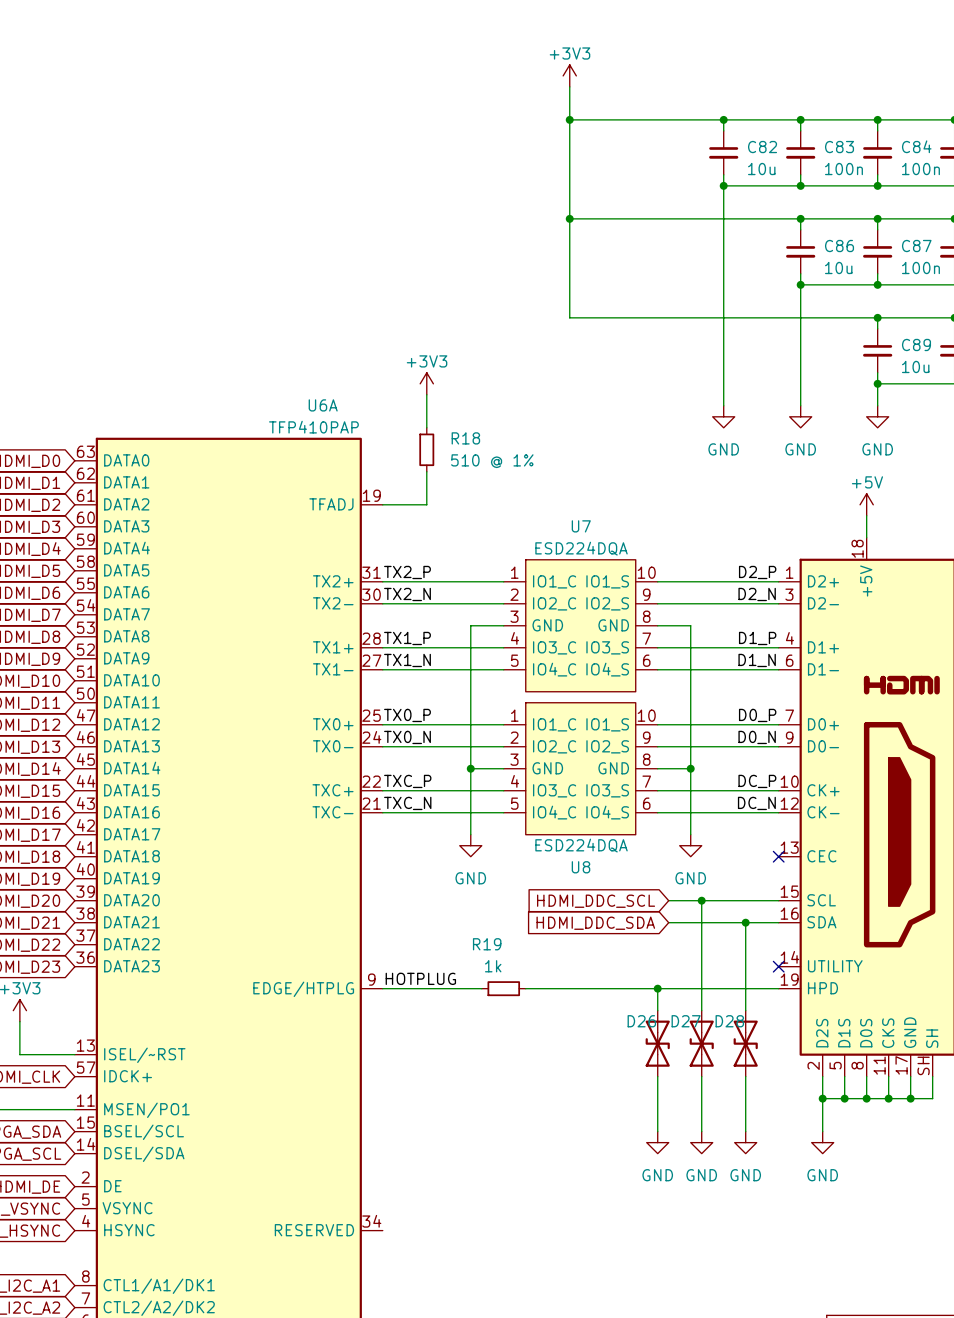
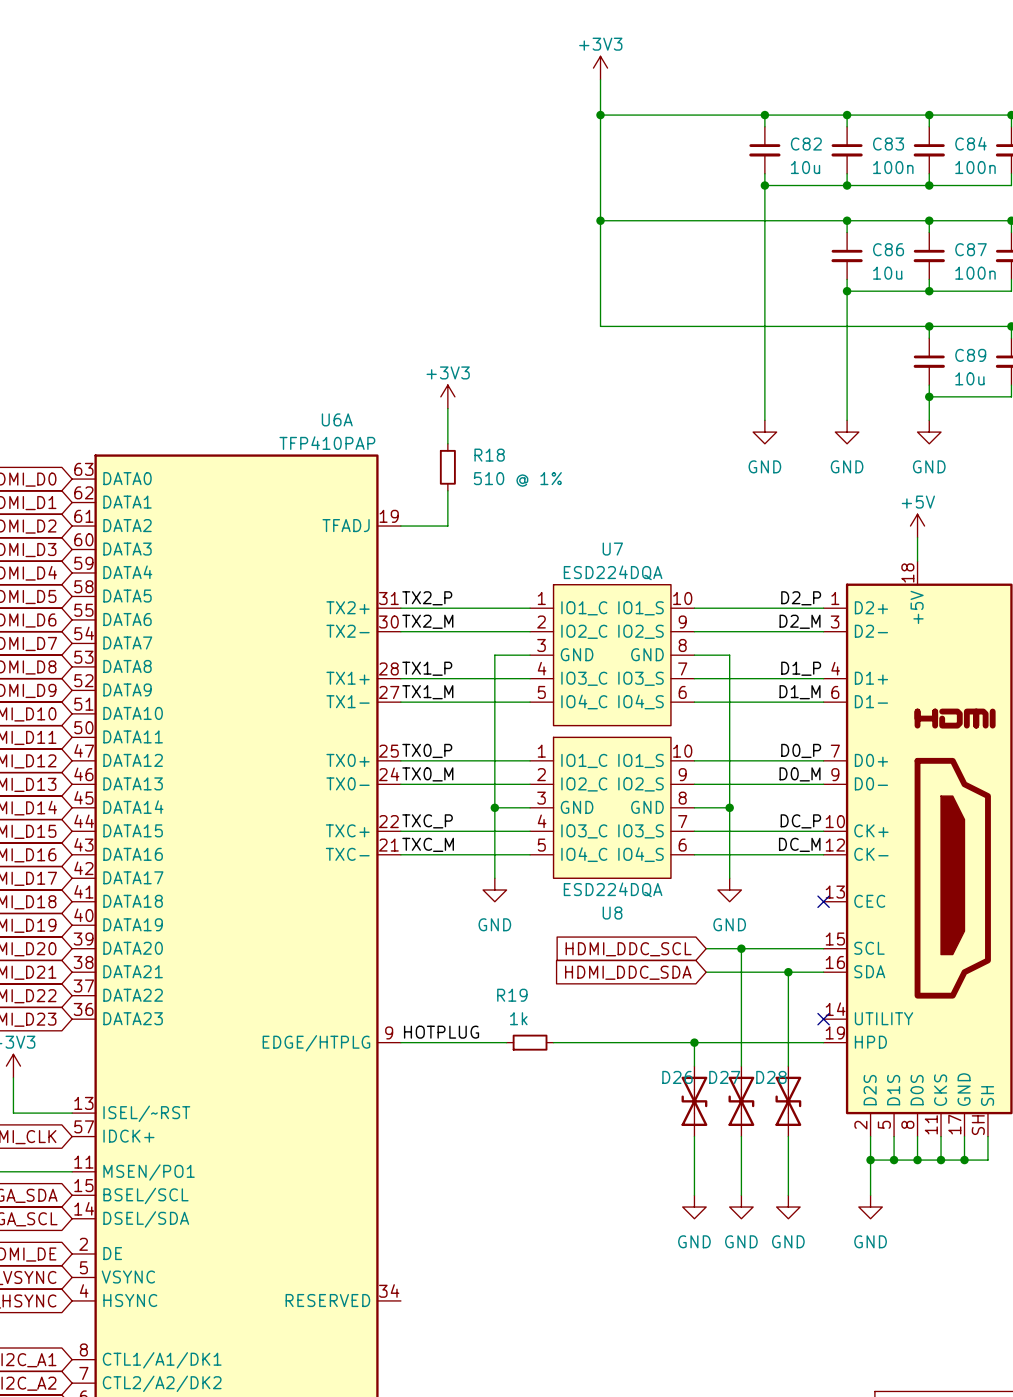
label: TX2_N (407, 594) -> TX2_M (427, 621)
label: D2_N (757, 594) -> D2_M (800, 621)
label: TX1_N (407, 660) -> TX1_M (427, 692)
label: D1_N (757, 660) -> D1_M (800, 692)
label: TX0_N (407, 737) -> TX0_M (427, 774)
label: D0_N (757, 737) -> D0_M (800, 774)
label: TXC_N (407, 803) -> TXC_M (428, 844)
label: DC_N (756, 803) -> DC_M (799, 844)

